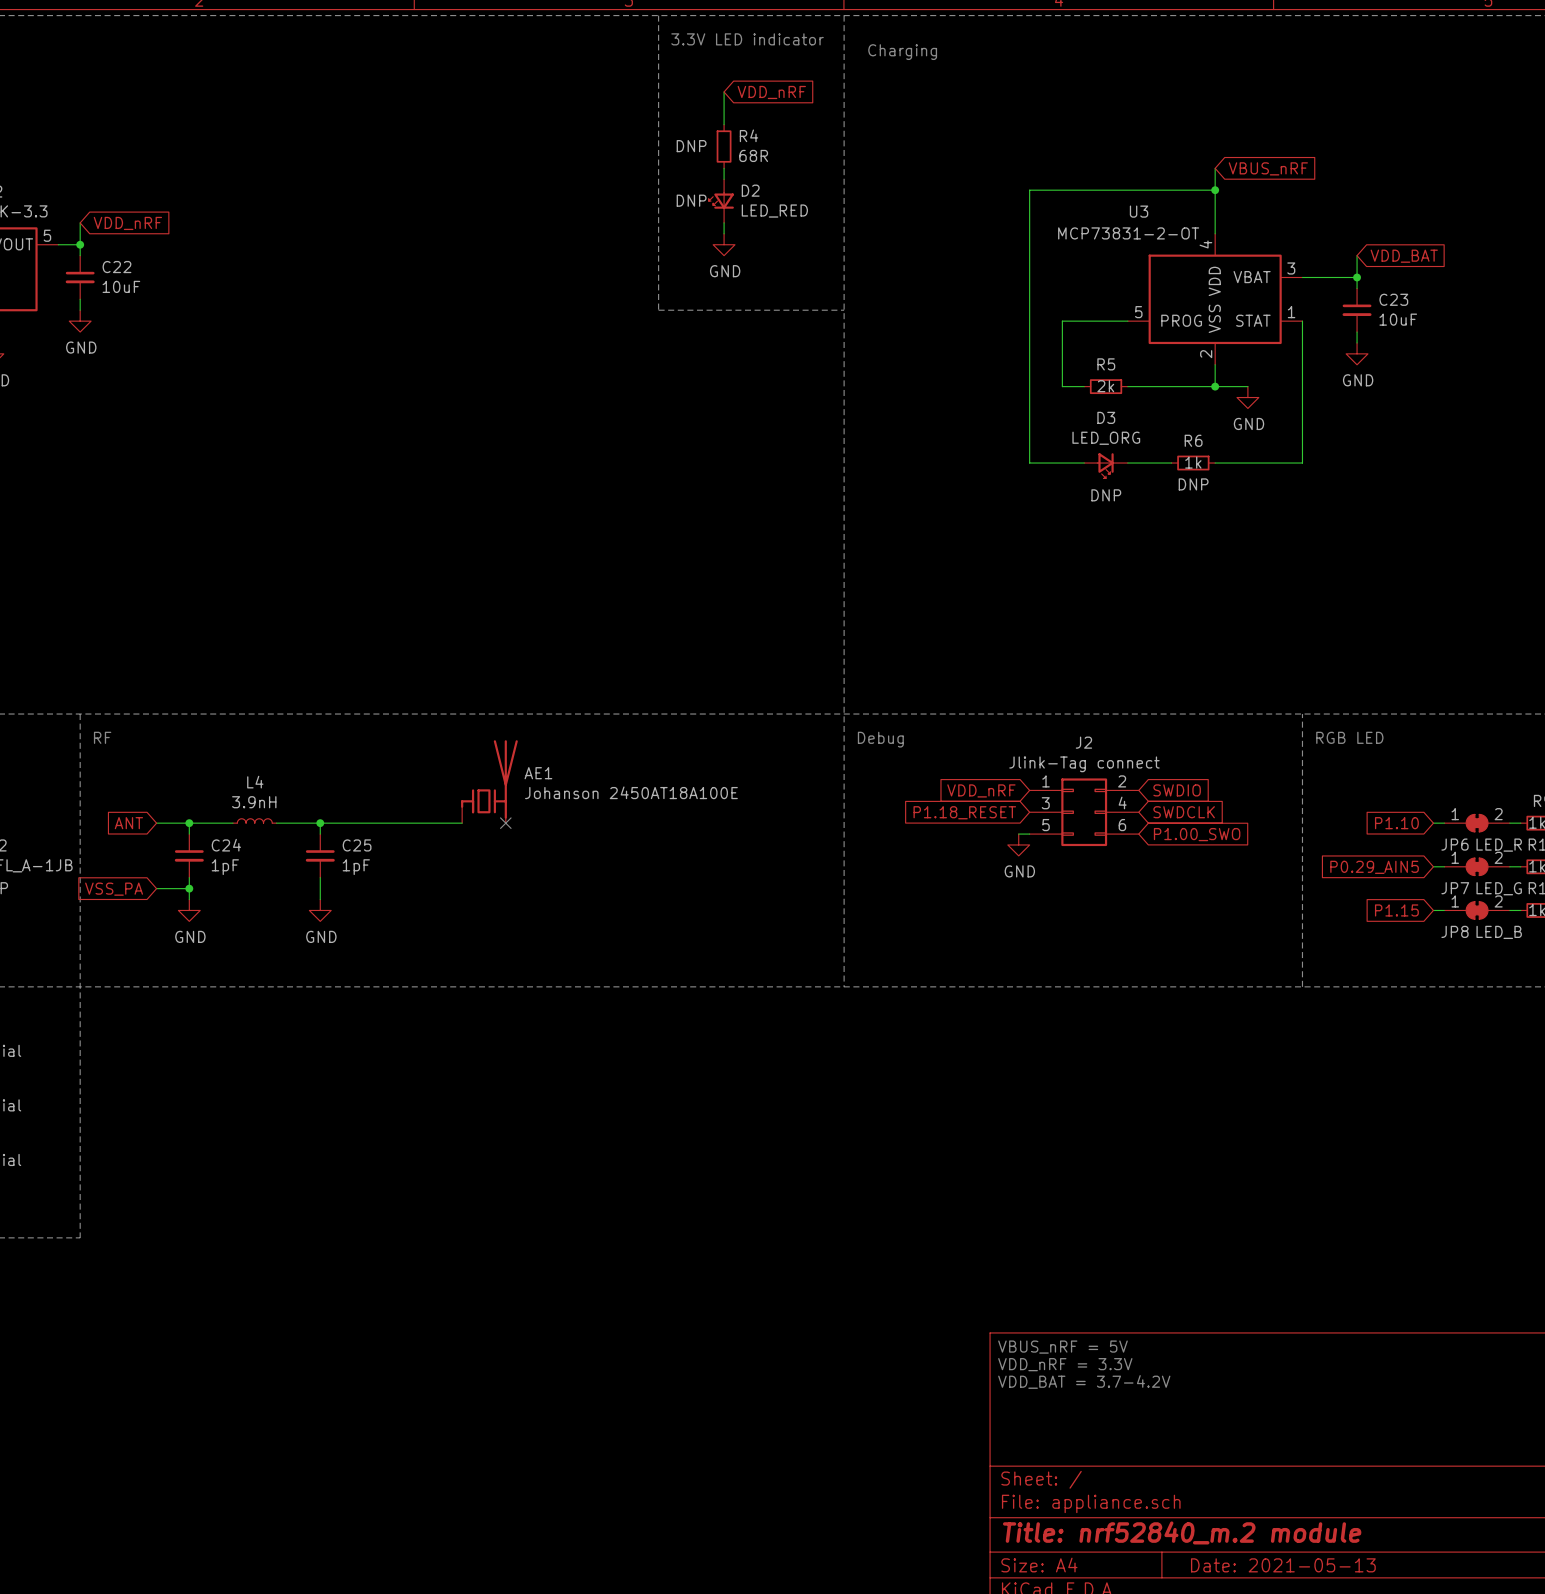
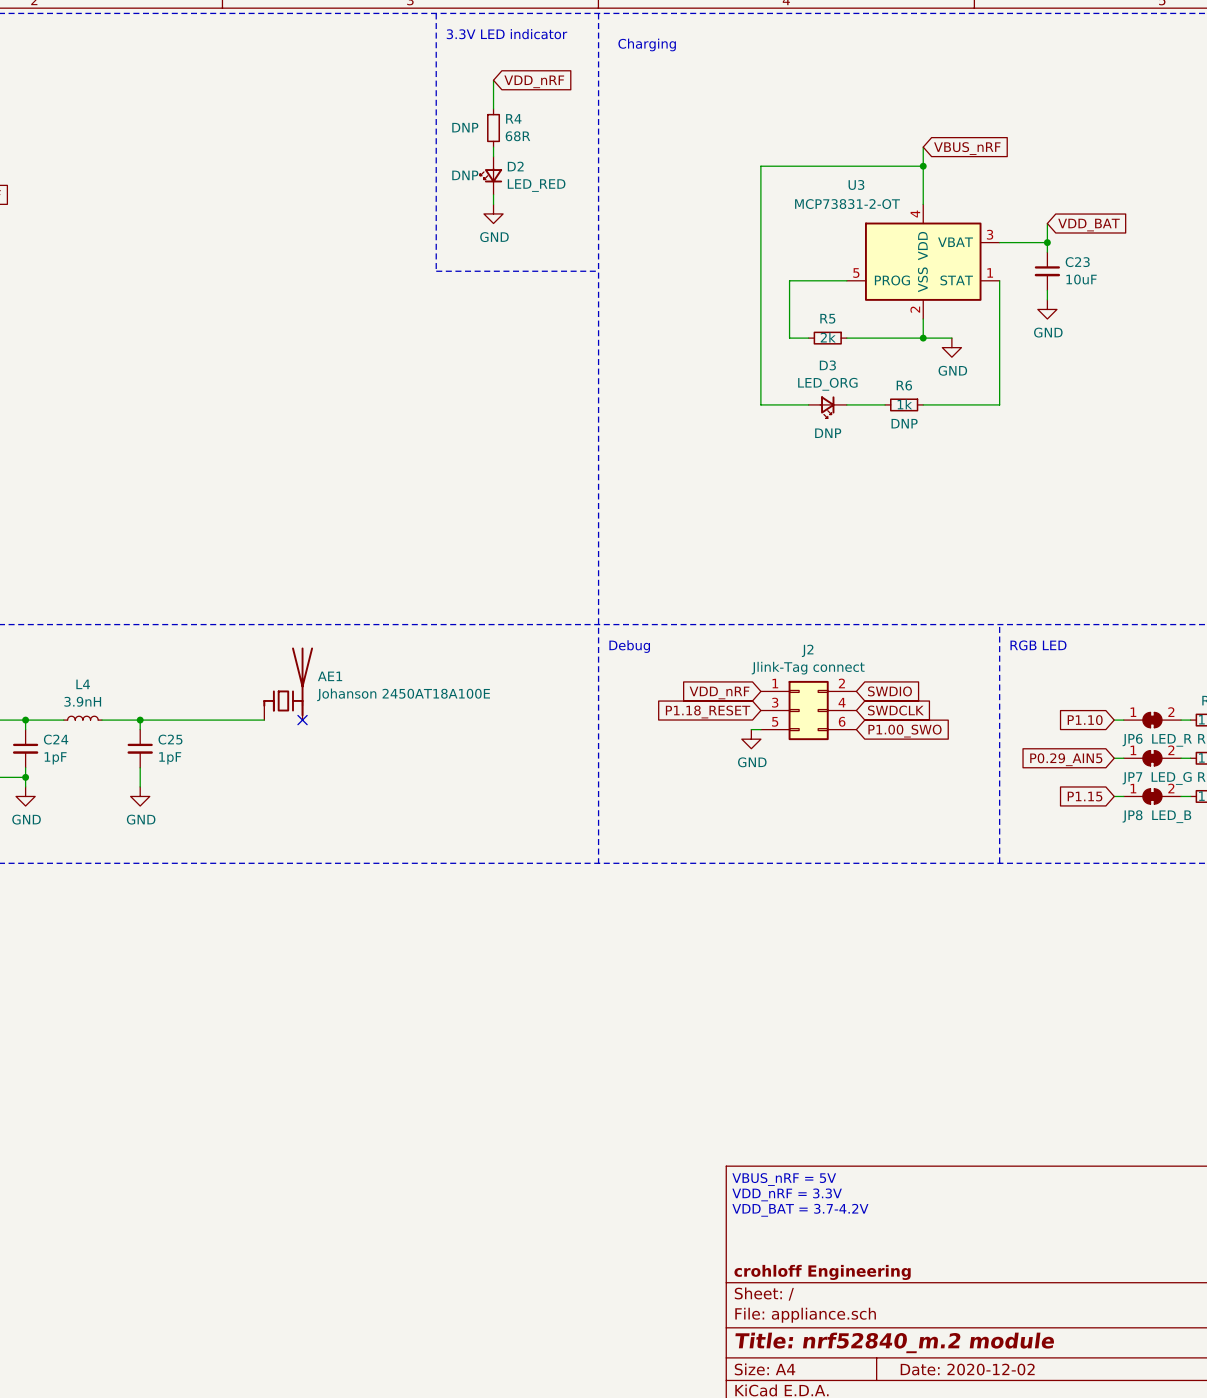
title block: none -> crohloff Engineering (822, 1272)
title block: Date: 2021-05-13 (1283, 1565) -> Date: 2020-12-02 (967, 1369)

